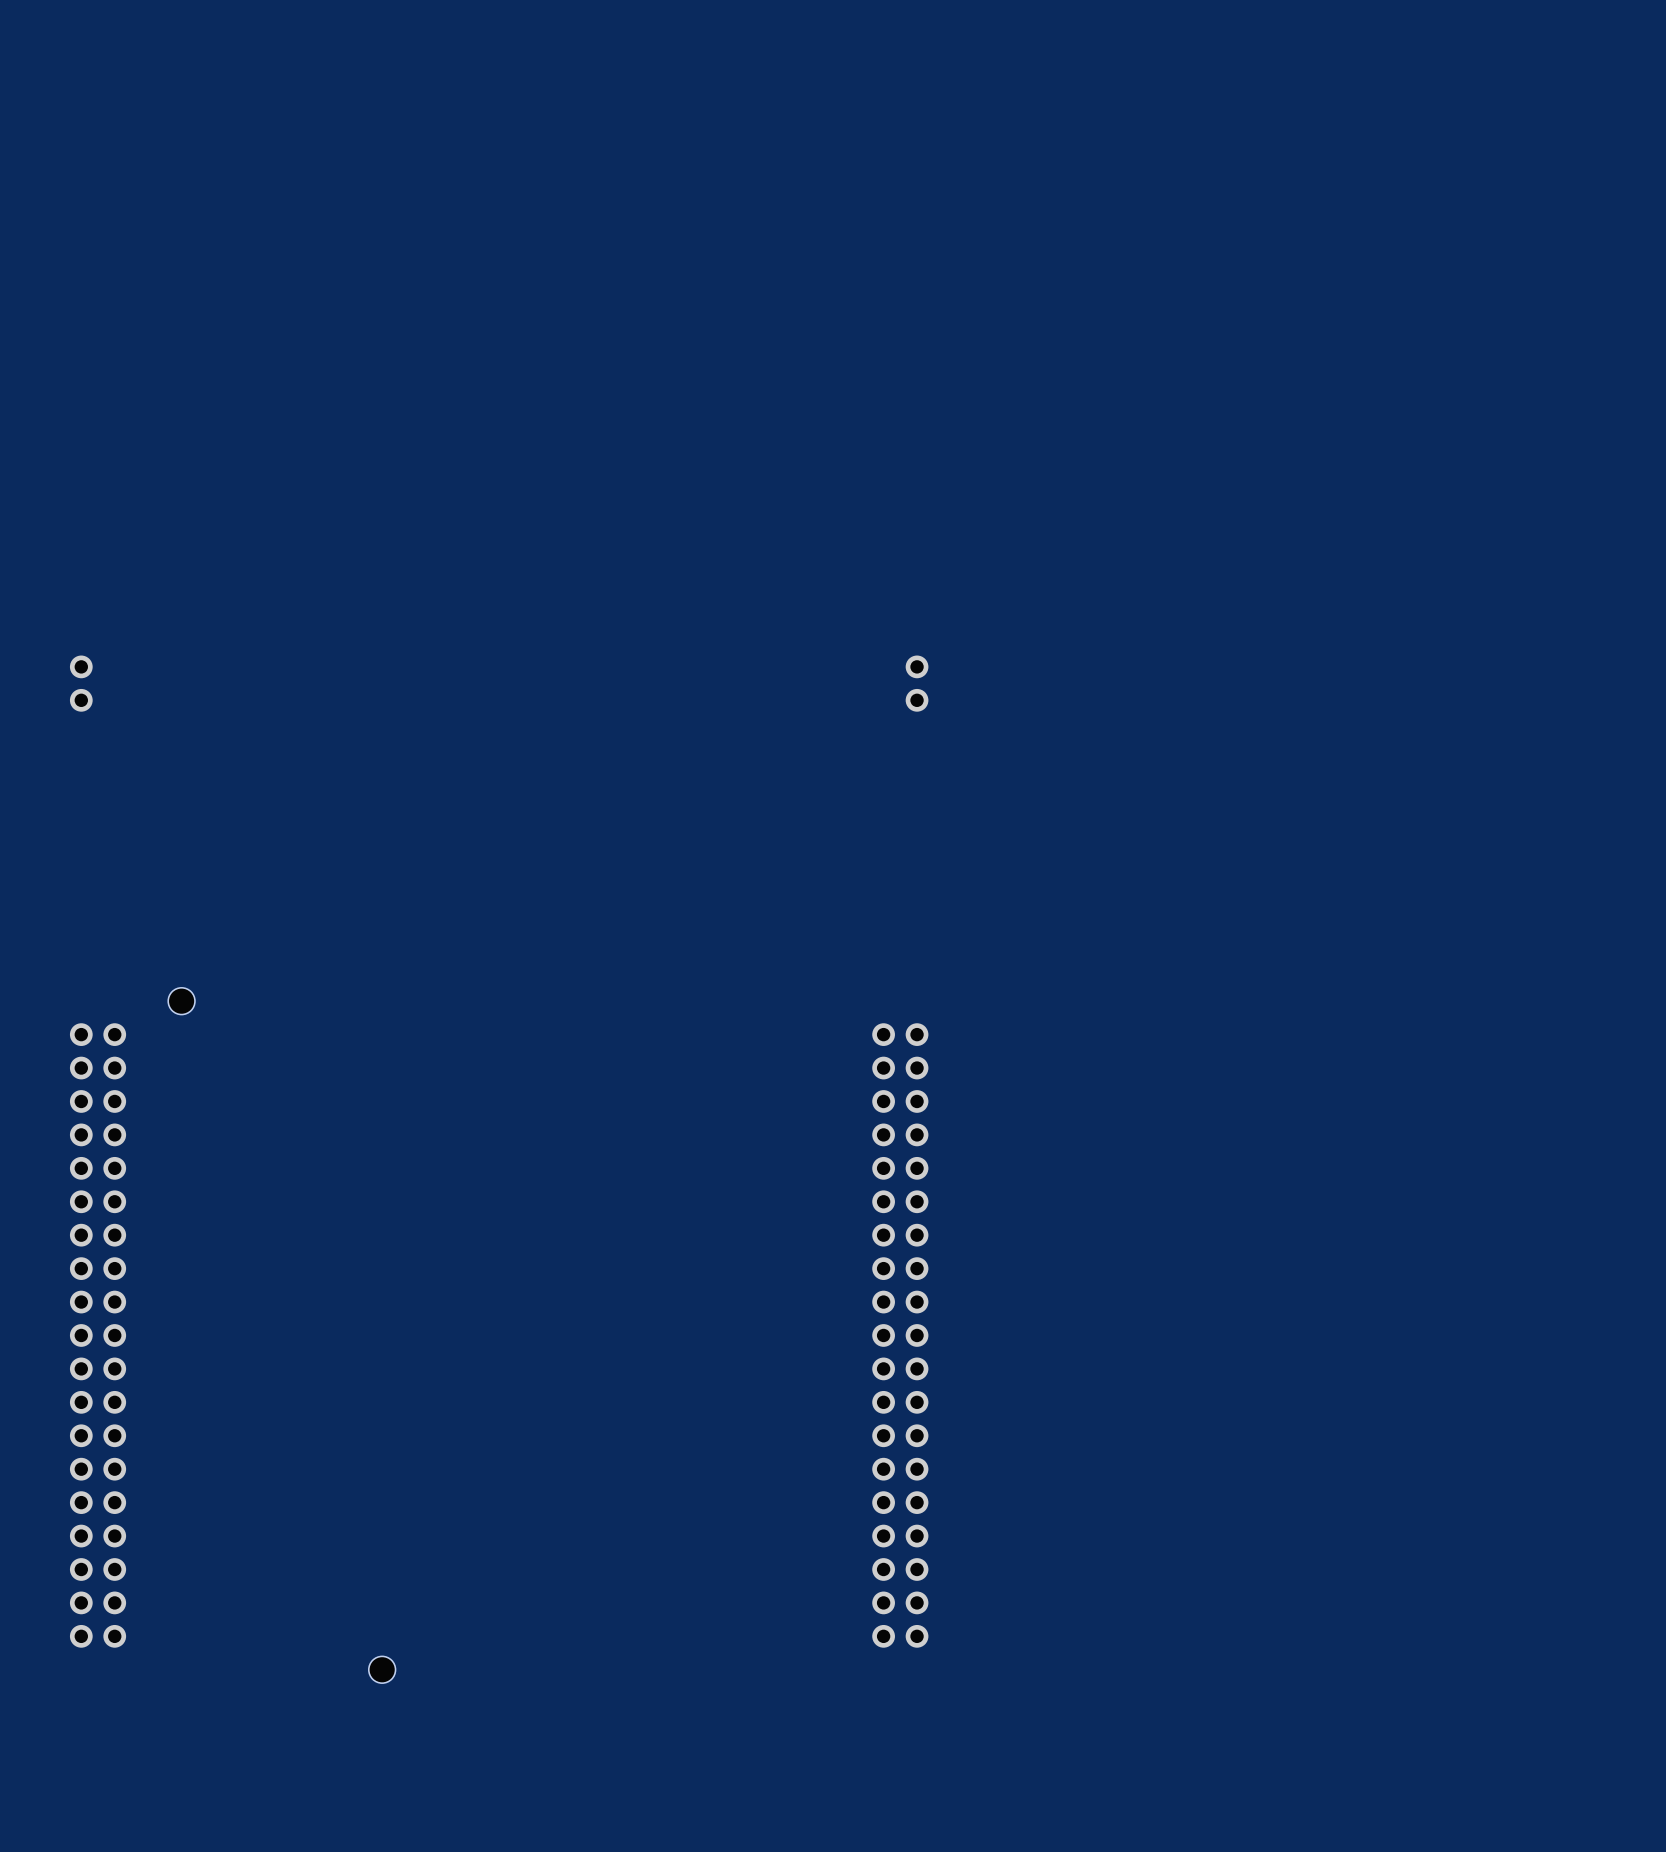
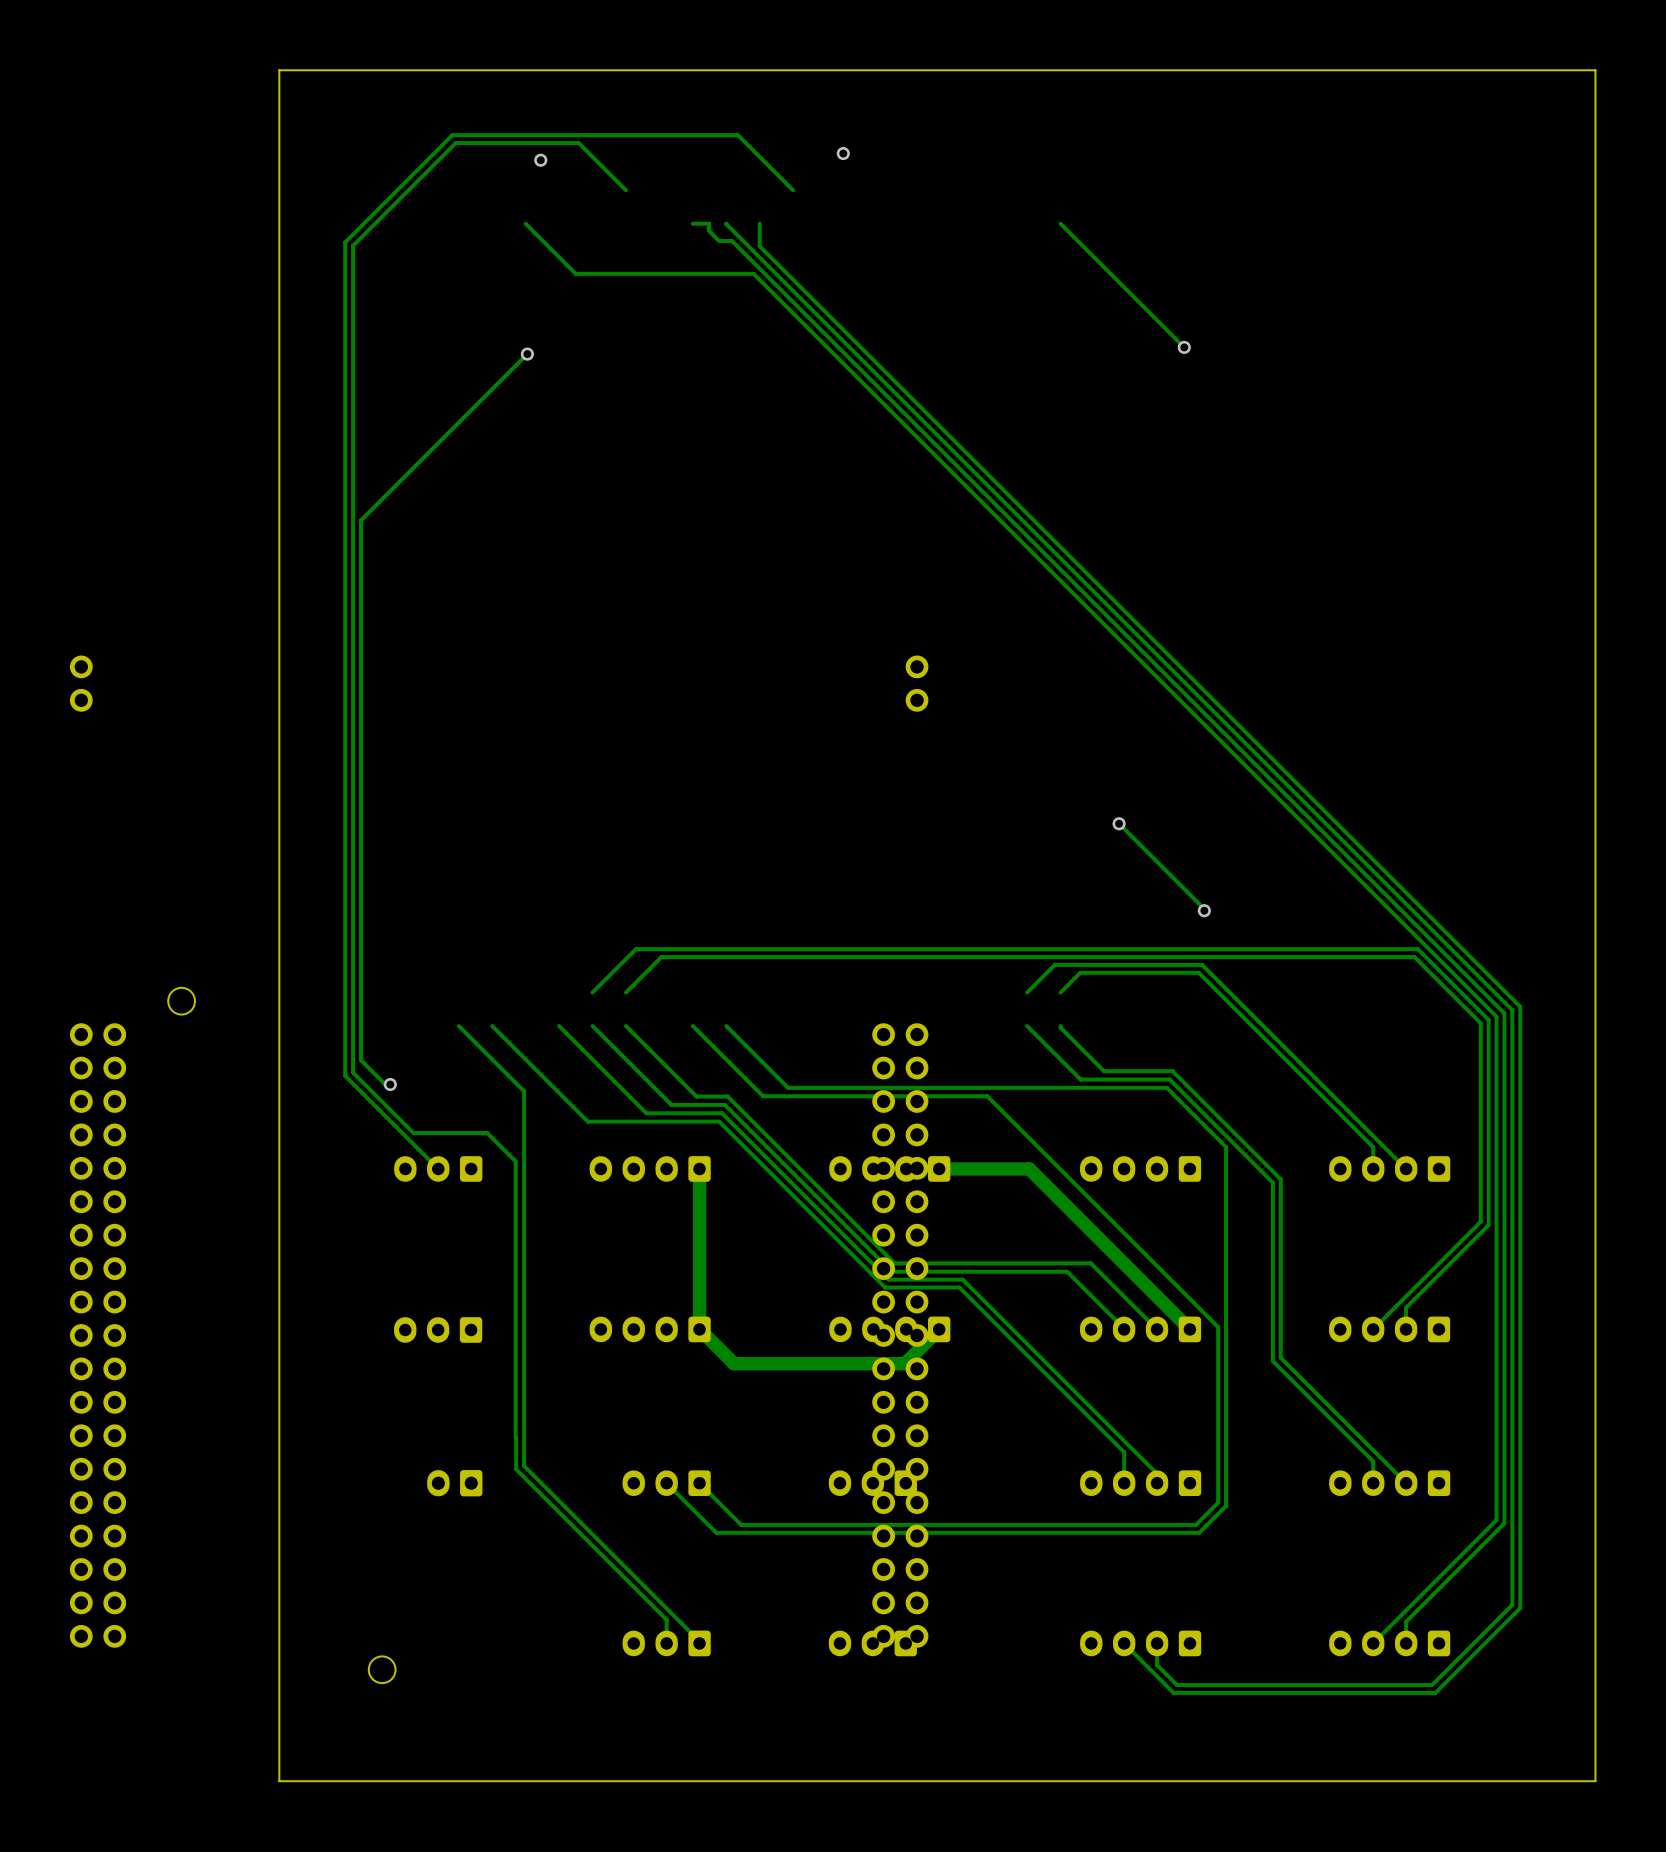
board edge: none -> (1595, 70) (279, 70) (279, 1781) (1595, 1781) (1595, 70)
via: none -> (843, 153)
via: none -> (540, 160)
track: none -> (626, 190) (578, 143) (455, 143) (353, 245) (353, 1072) (413, 1133) (487, 1133) (515, 1161) (516, 1469) (666, 1619) (666, 1643)
track: none -> (793, 190) (737, 135) (452, 135) (345, 242) (345, 1075) (438, 1168)
track: none -> (525, 223) (575, 273) (753, 273) (1496, 1016) (1496, 1520) (1373, 1643)
track: none -> (692, 223) (709, 223) (709, 230) (719, 241) (732, 241) (1504, 1013) (1504, 1523) (1406, 1621) (1406, 1643)
track: none -> (726, 223) (1512, 1010) (1512, 1604) (1432, 1685) (1176, 1685) (1157, 1665) (1157, 1643)
track: none -> (759, 223) (759, 246) (1520, 1006) (1520, 1608) (1435, 1692) (1173, 1692) (1124, 1643)
track: none -> (1060, 223) (1184, 347)
via: none -> (1184, 347)
track: none -> (527, 354) (360, 520) (360, 1060) (385, 1084) (390, 1084)
via: none -> (527, 354)
track: none -> (1119, 823) (1204, 910)
via: none -> (1119, 823)
via: none -> (1204, 910)
track: none -> (592, 992) (636, 949) (1417, 949) (1488, 1019) (1488, 1225) (1406, 1307) (1406, 1329)
track: none -> (626, 992) (661, 957) (1414, 957) (1480, 1023) (1480, 1221) (1373, 1329)
track: none -> (1027, 992) (1054, 964) (1202, 964) (1406, 1168)
track: none -> (1060, 992) (1080, 972) (1198, 972) (1373, 1147) (1373, 1168)
track: none -> (458, 1026) (524, 1091) (524, 1465) (699, 1643)
track: none -> (492, 1026) (587, 1121) (719, 1121) (885, 1287) (959, 1287) (1124, 1452) (1124, 1483)
track: none -> (559, 1026) (646, 1113) (722, 1113) (888, 1279) (962, 1279) (1157, 1473) (1157, 1483)
track: none -> (592, 1026) (671, 1104) (724, 1104) (891, 1271) (1067, 1271) (1124, 1329)
track: none -> (626, 1026) (696, 1096) (727, 1096) (894, 1263) (1090, 1263) (1156, 1329)
track: none -> (692, 1026) (763, 1096) (987, 1096) (1218, 1327) (1218, 1502) (1196, 1524) (741, 1524) (699, 1483)
track: none -> (726, 1026) (788, 1087) (1166, 1087) (1226, 1146) (1226, 1506) (1199, 1532) (716, 1532) (666, 1483)
track: none -> (1027, 1026) (1080, 1079) (1169, 1079) (1272, 1182) (1272, 1361) (1373, 1461) (1373, 1483)
track: none -> (1060, 1026) (1104, 1071) (1172, 1071) (1280, 1179) (1280, 1357) (1406, 1483)
via: none -> (390, 1084)
part: none -> (438, 1168)
part: none -> (650, 1168)
track: none -> (699, 1168) (699, 1329) (734, 1363) (904, 1363) (939, 1329)
part: none -> (889, 1168)
track: none -> (939, 1168) (1029, 1168) (1189, 1329)
part: none -> (1140, 1168)
part: none -> (1389, 1168)
part: none -> (438, 1329)
part: none -> (650, 1329)
part: none -> (889, 1329)
part: none -> (1140, 1329)
part: none -> (1389, 1329)
part: none -> (454, 1483)
part: none -> (666, 1483)
part: none -> (872, 1483)
part: none -> (1140, 1483)
part: none -> (1389, 1483)
part: none -> (666, 1643)
part: none -> (872, 1643)
part: none -> (1140, 1643)
part: none -> (1389, 1643)

